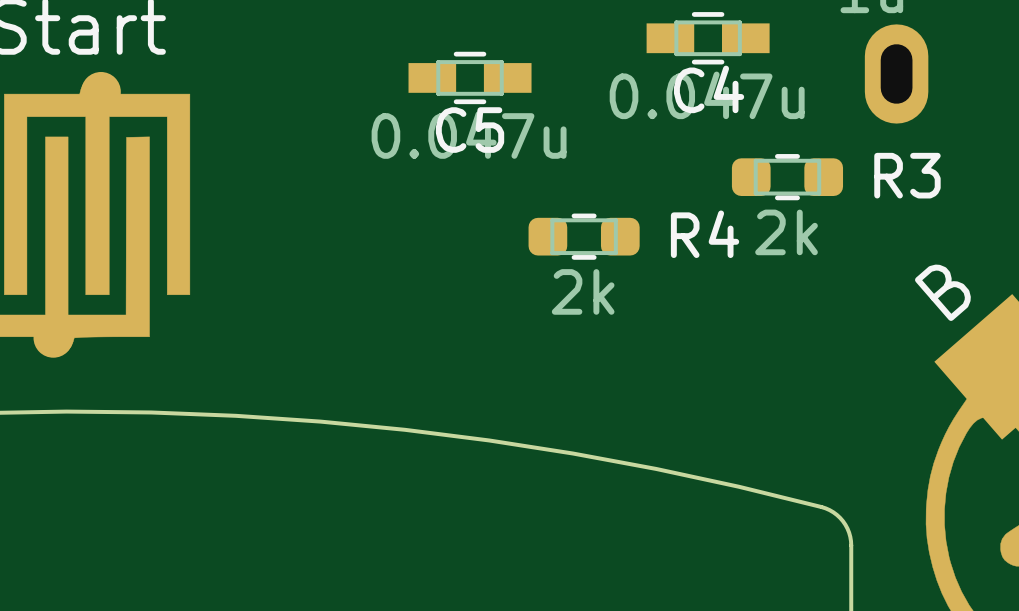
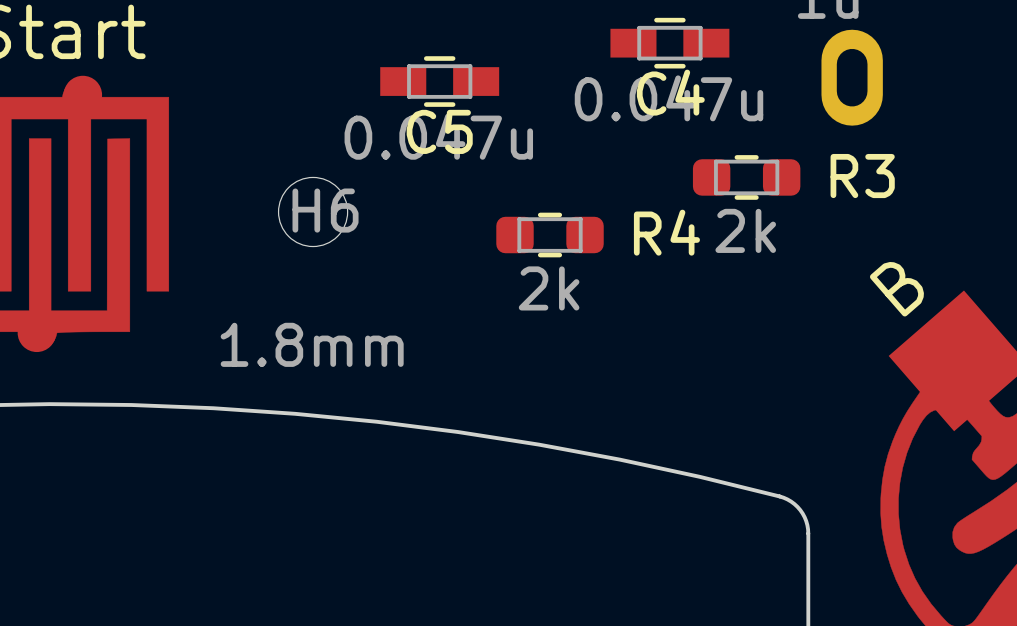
H6: none -> 1.8mm (313, 211)

